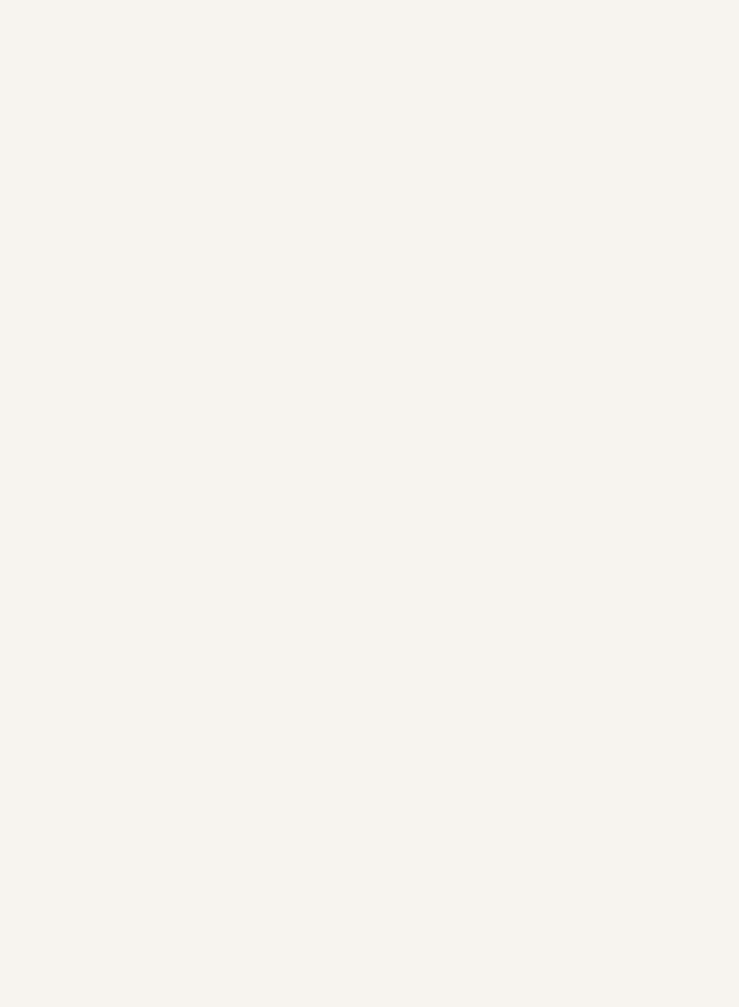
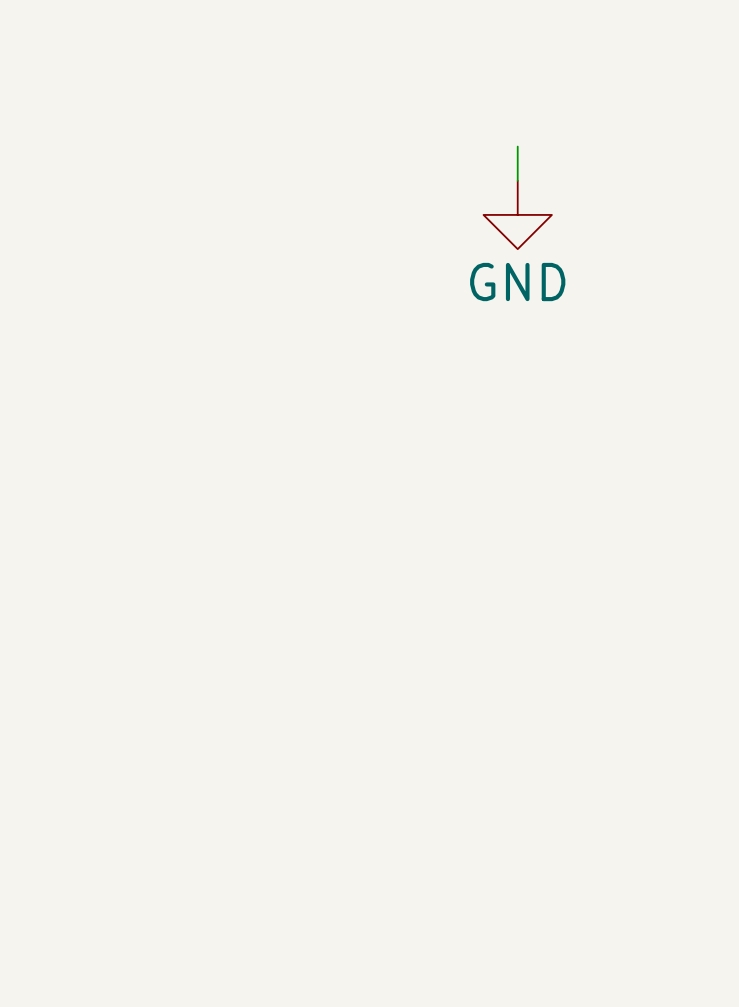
wire: none -> (517, 146) (517, 180)
power symbol: none -> GND (517, 214)

